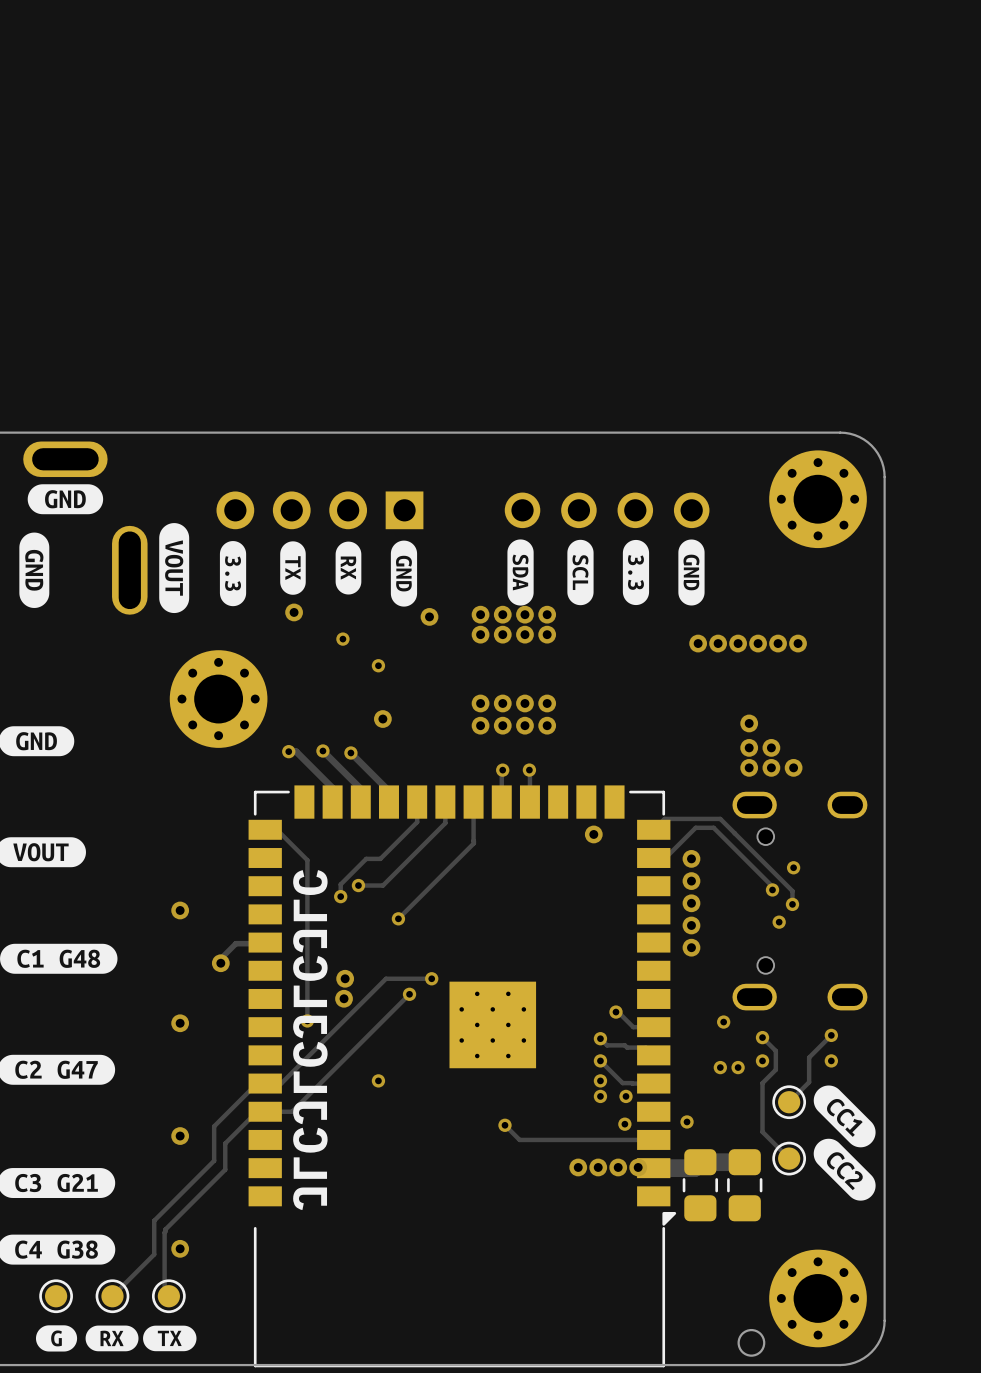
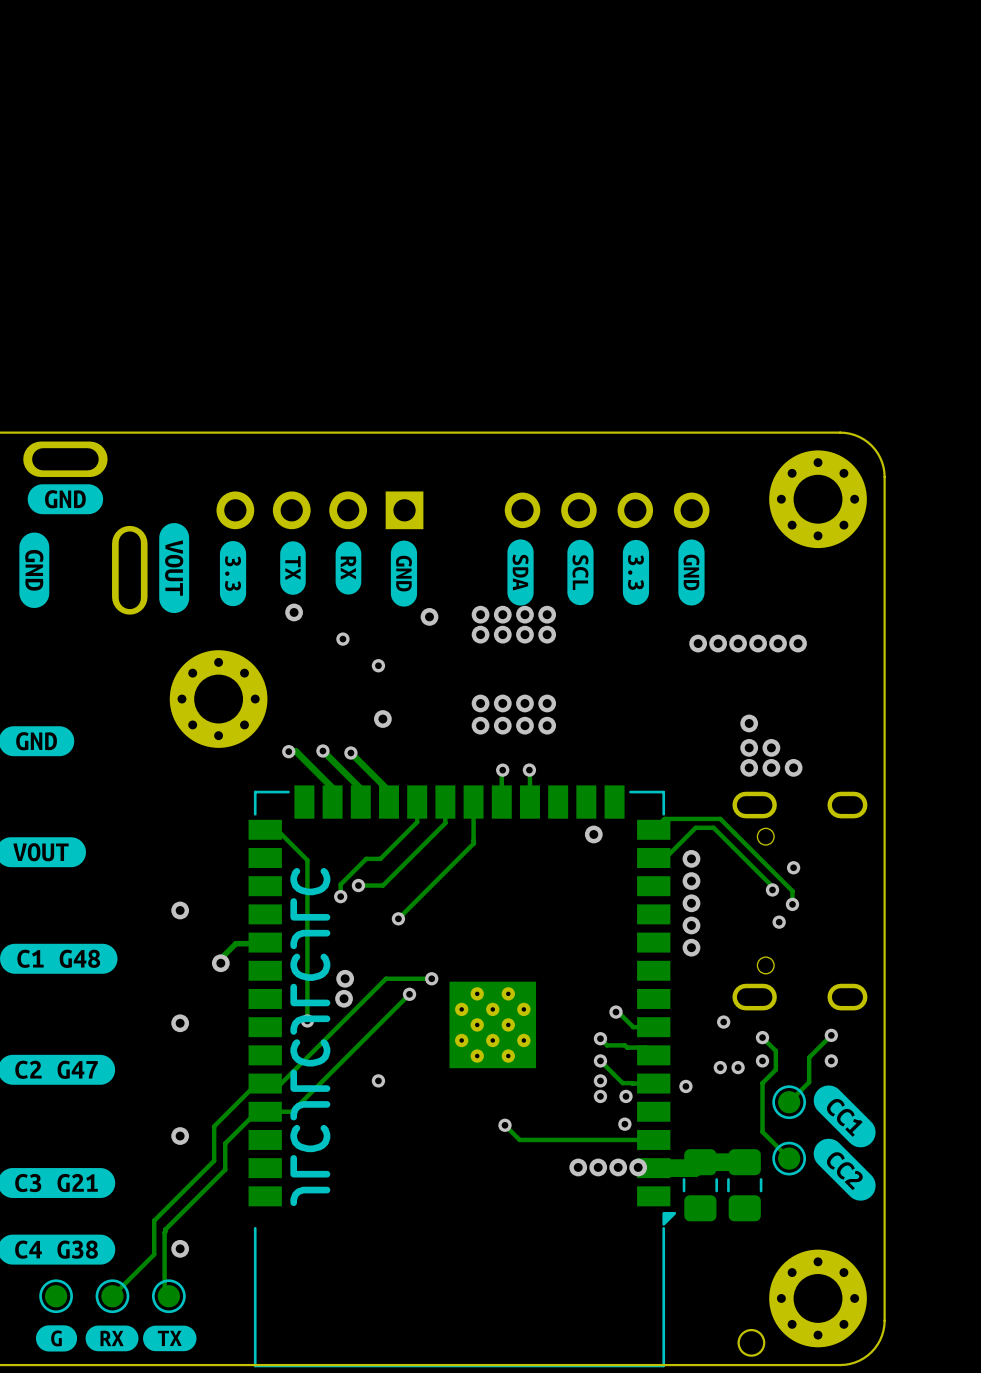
via position: (687, 1121) -> (685, 1086)

